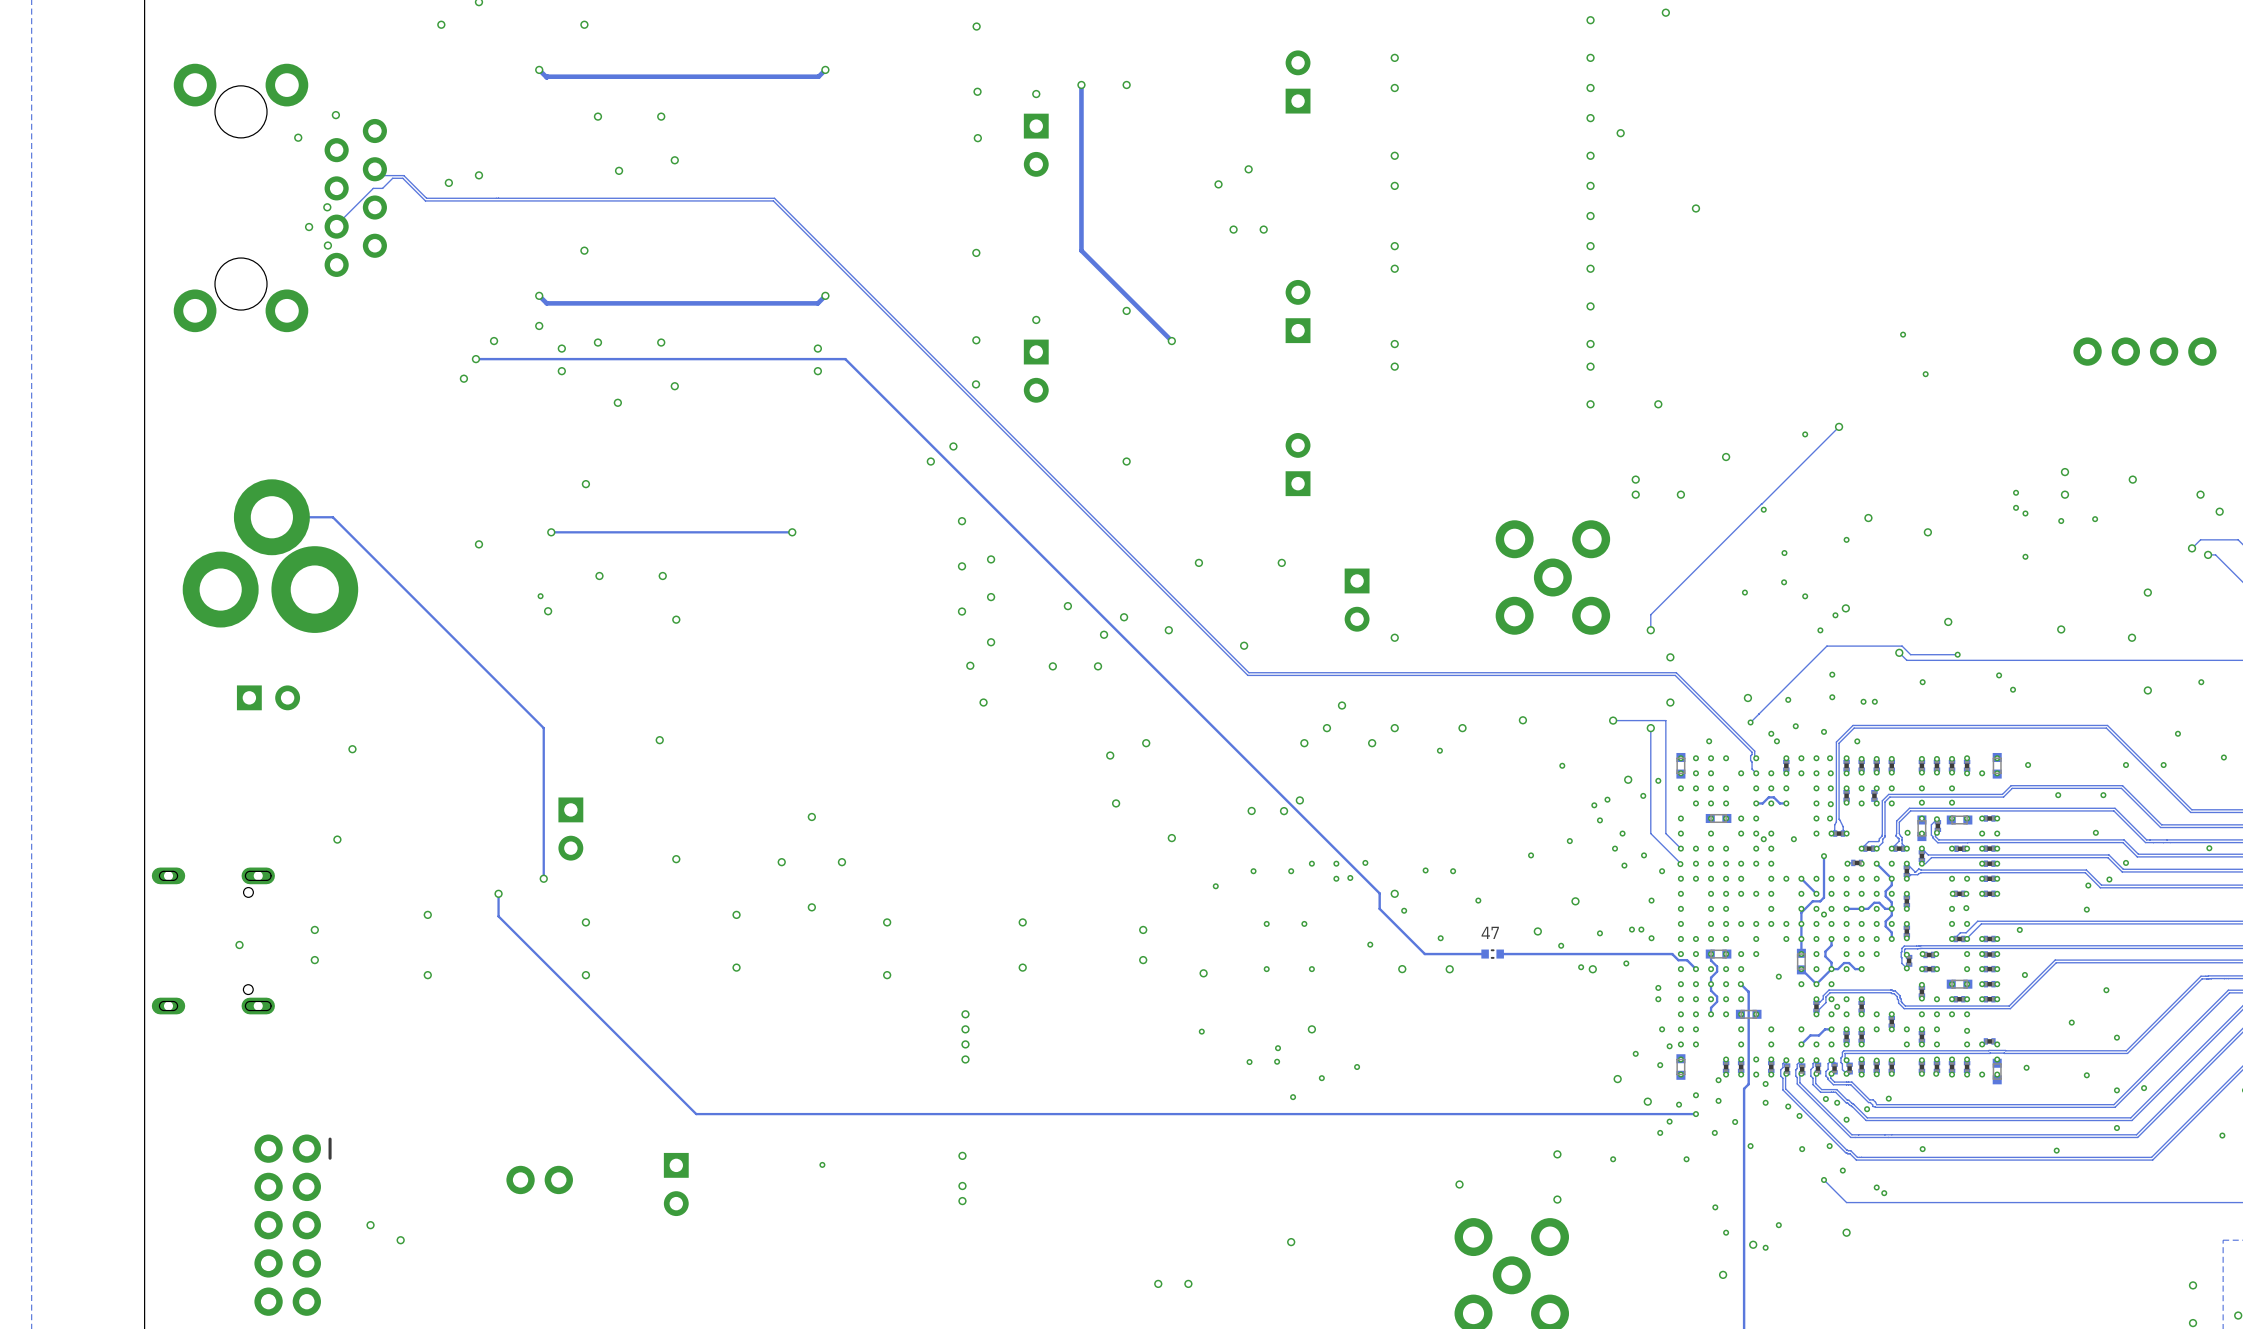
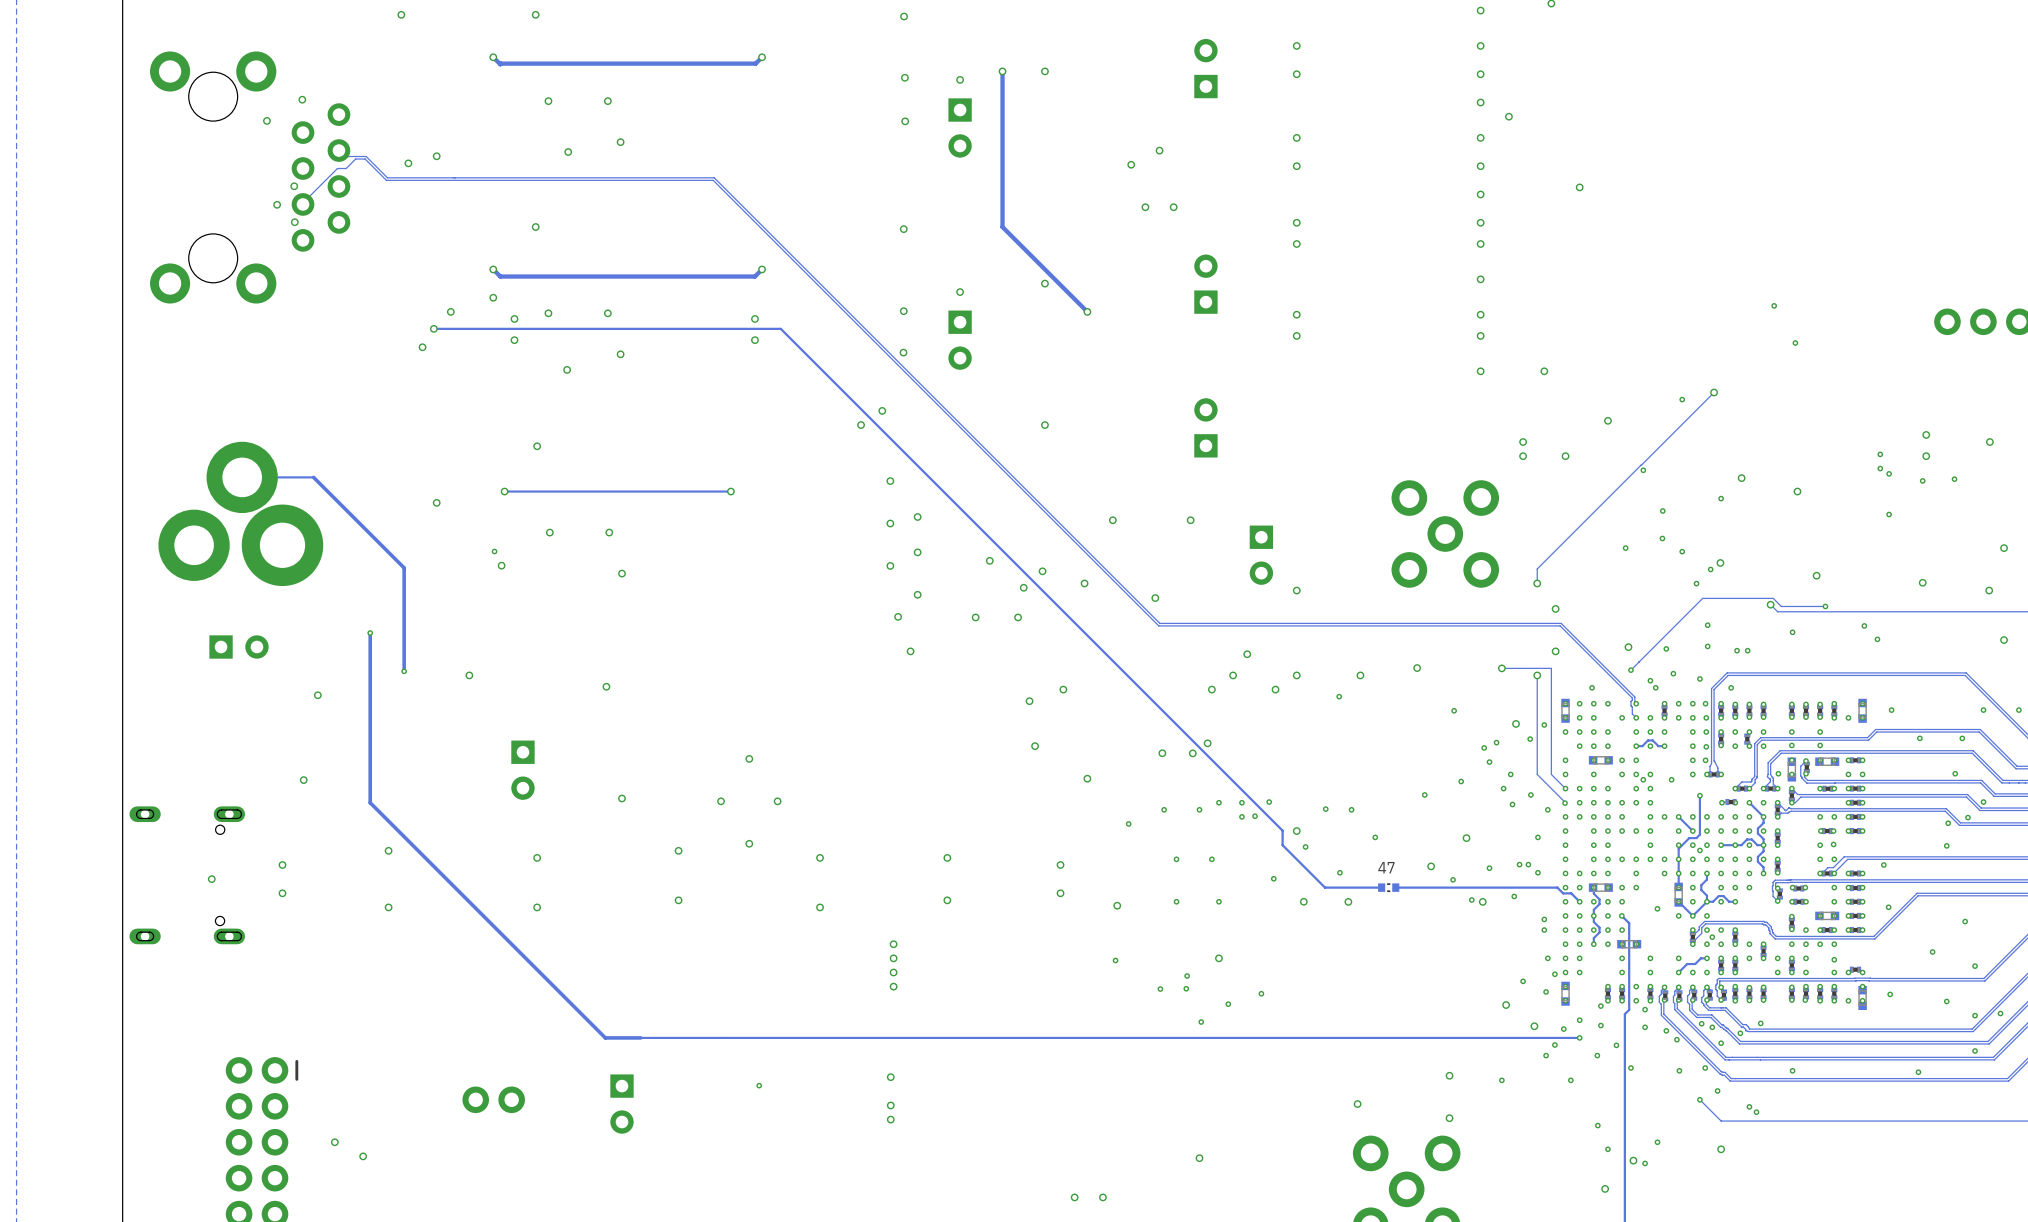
track: (332, 517) (543, 728) (543, 878) -> (299, 477) (313, 477) (404, 567) (404, 671)
via: none -> (370, 633)
via: none -> (404, 671)
via: none -> (469, 675)
via: (543, 878) -> none
track: (498, 893) (498, 916) (696, 1114) -> (370, 633) (370, 802) (605, 1037) (640, 1037)
via: (498, 893) -> none

